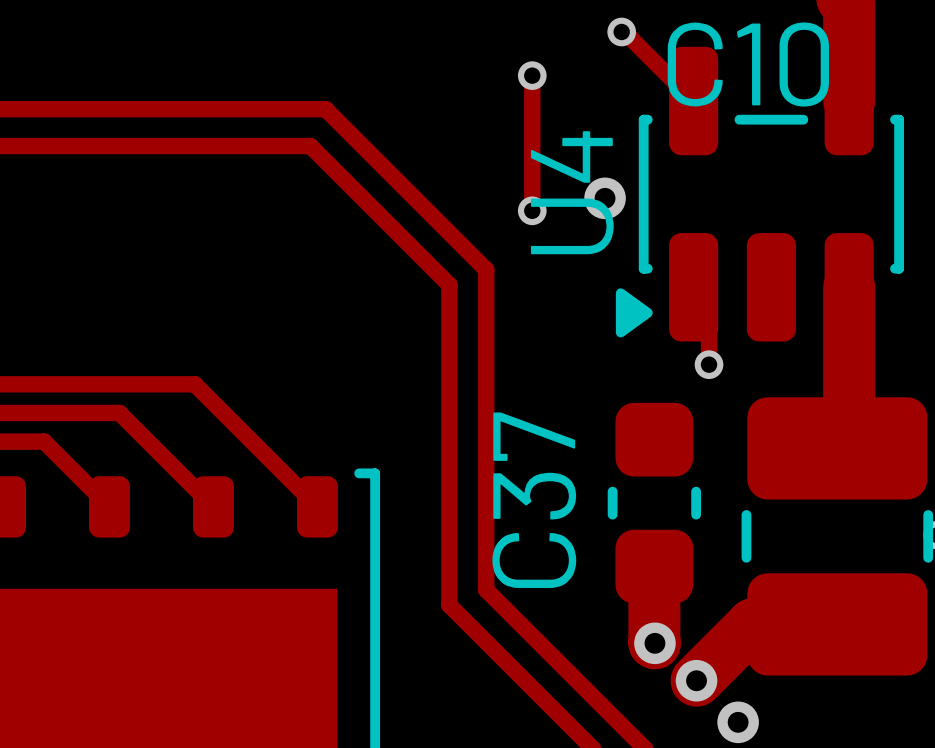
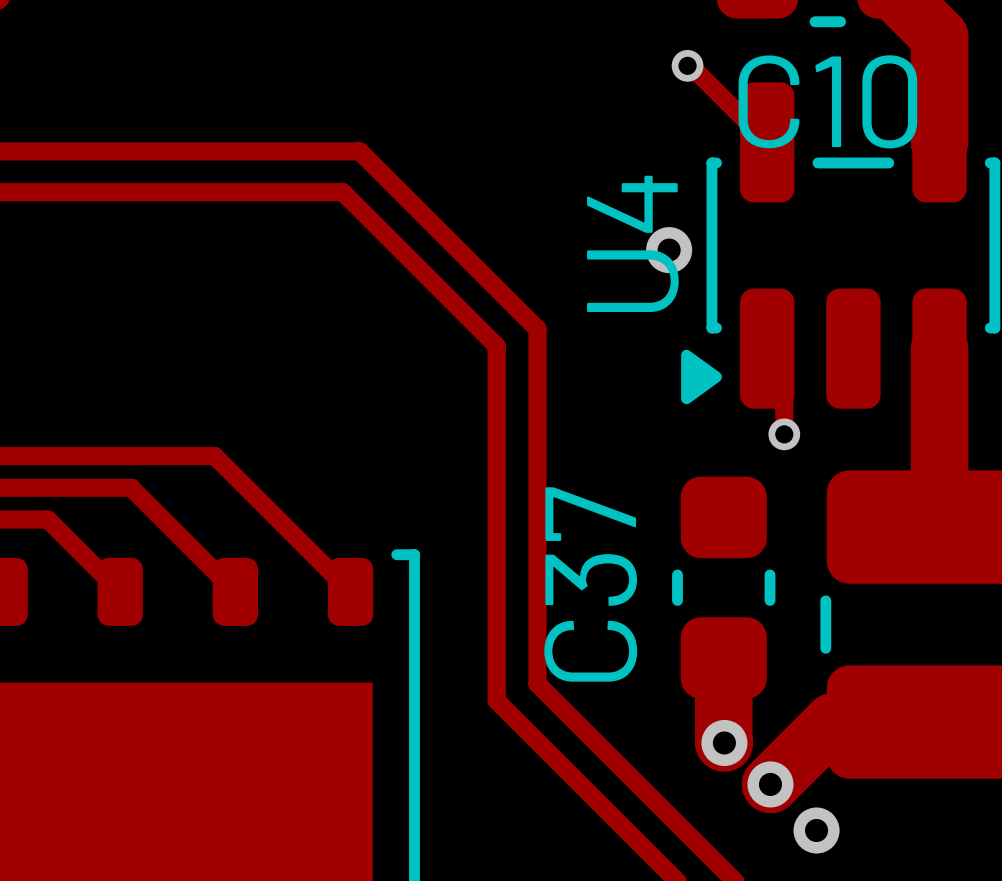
track: (532, 75) (532, 210) -> none
via: (532, 75) -> none
via: (532, 210) -> none

